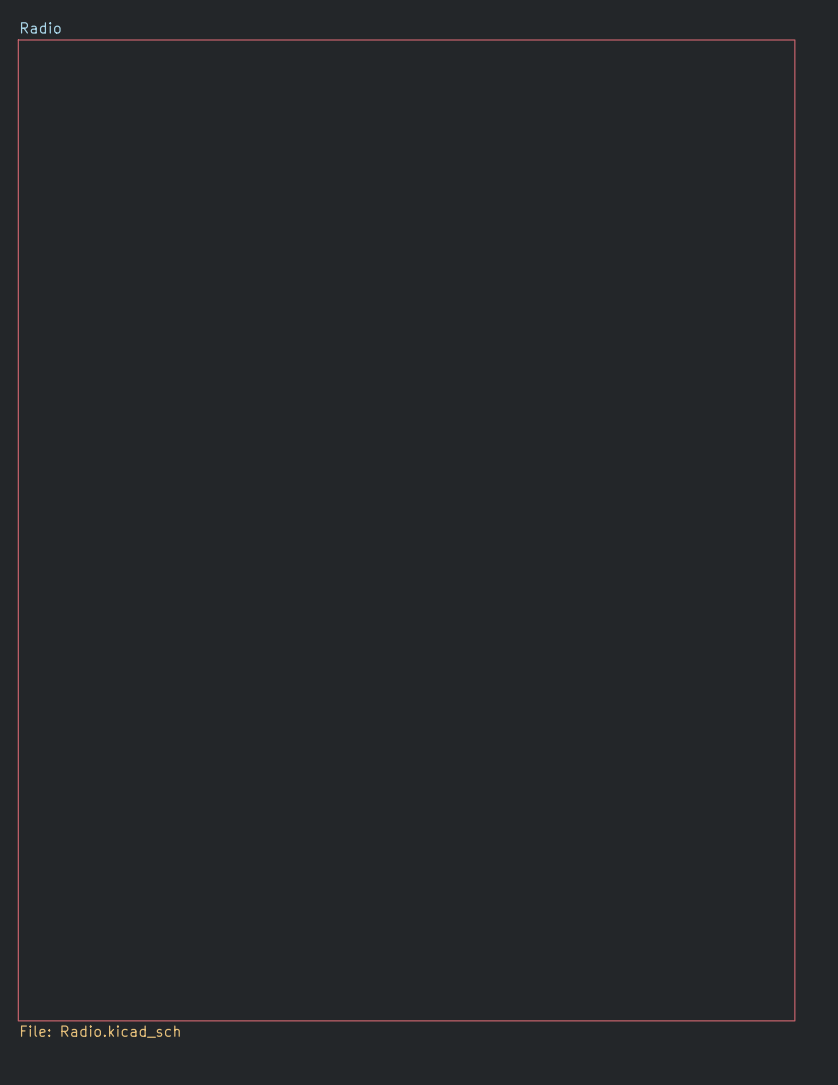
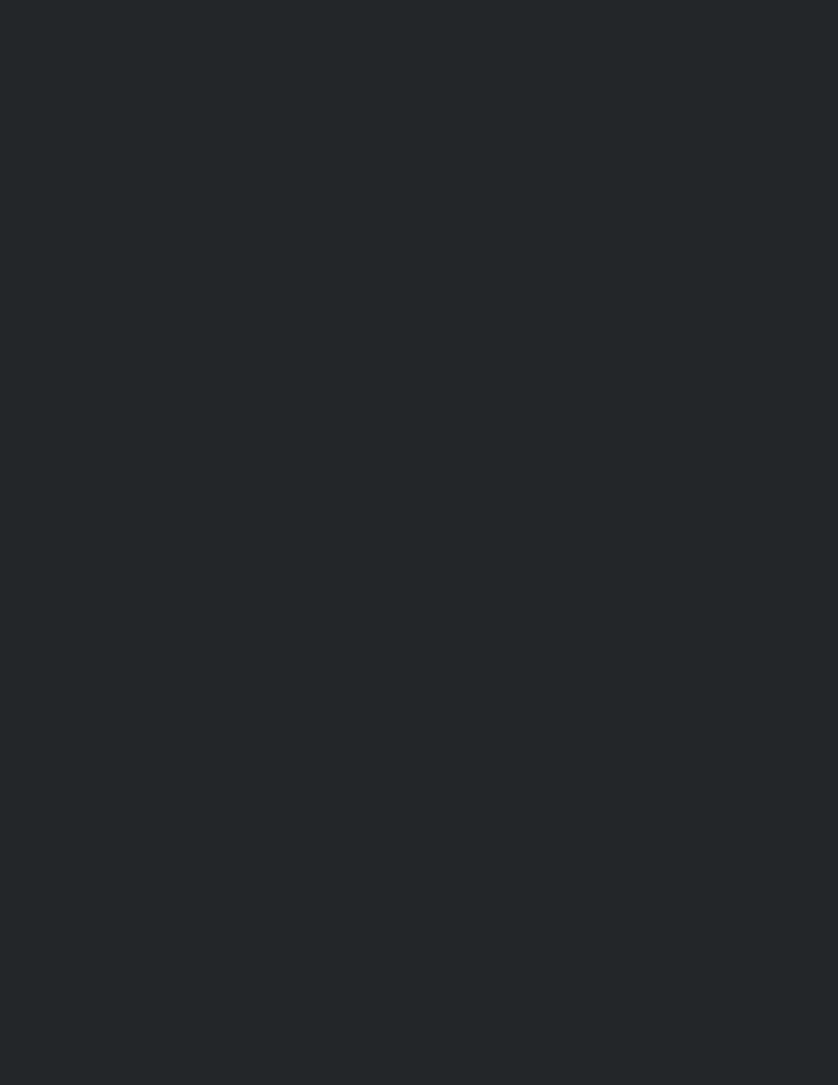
sheet Radio: File: Radio.kicad_sch (406, 530) -> none

